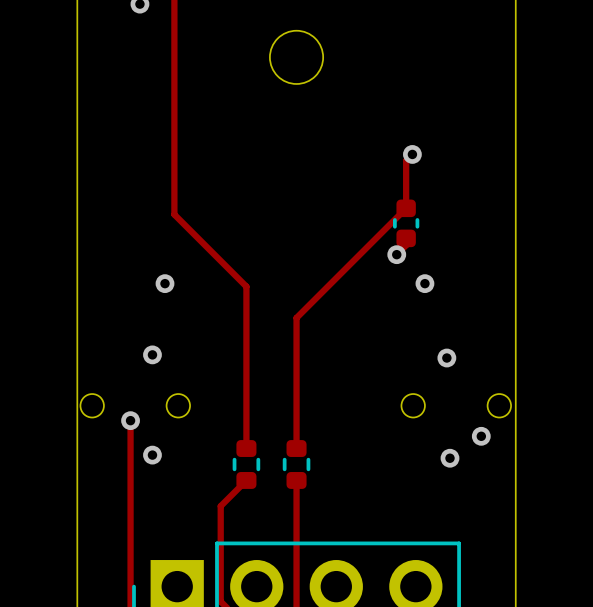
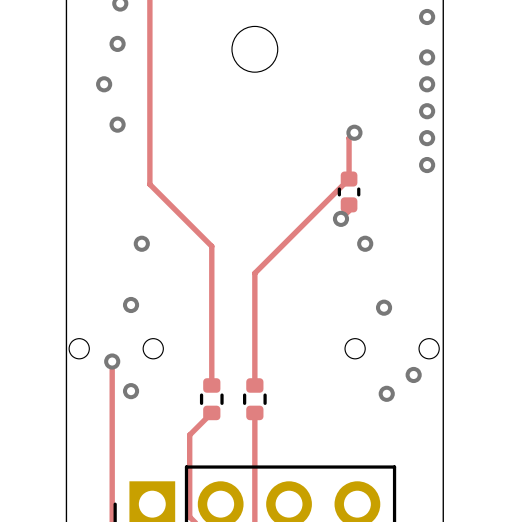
via: none -> (427, 17)
via: none -> (117, 43)
via: none -> (427, 57)
via: none -> (104, 84)
via: none -> (427, 84)
via: none -> (427, 111)
via: none -> (117, 124)
via: none -> (427, 138)
via: none -> (427, 165)

